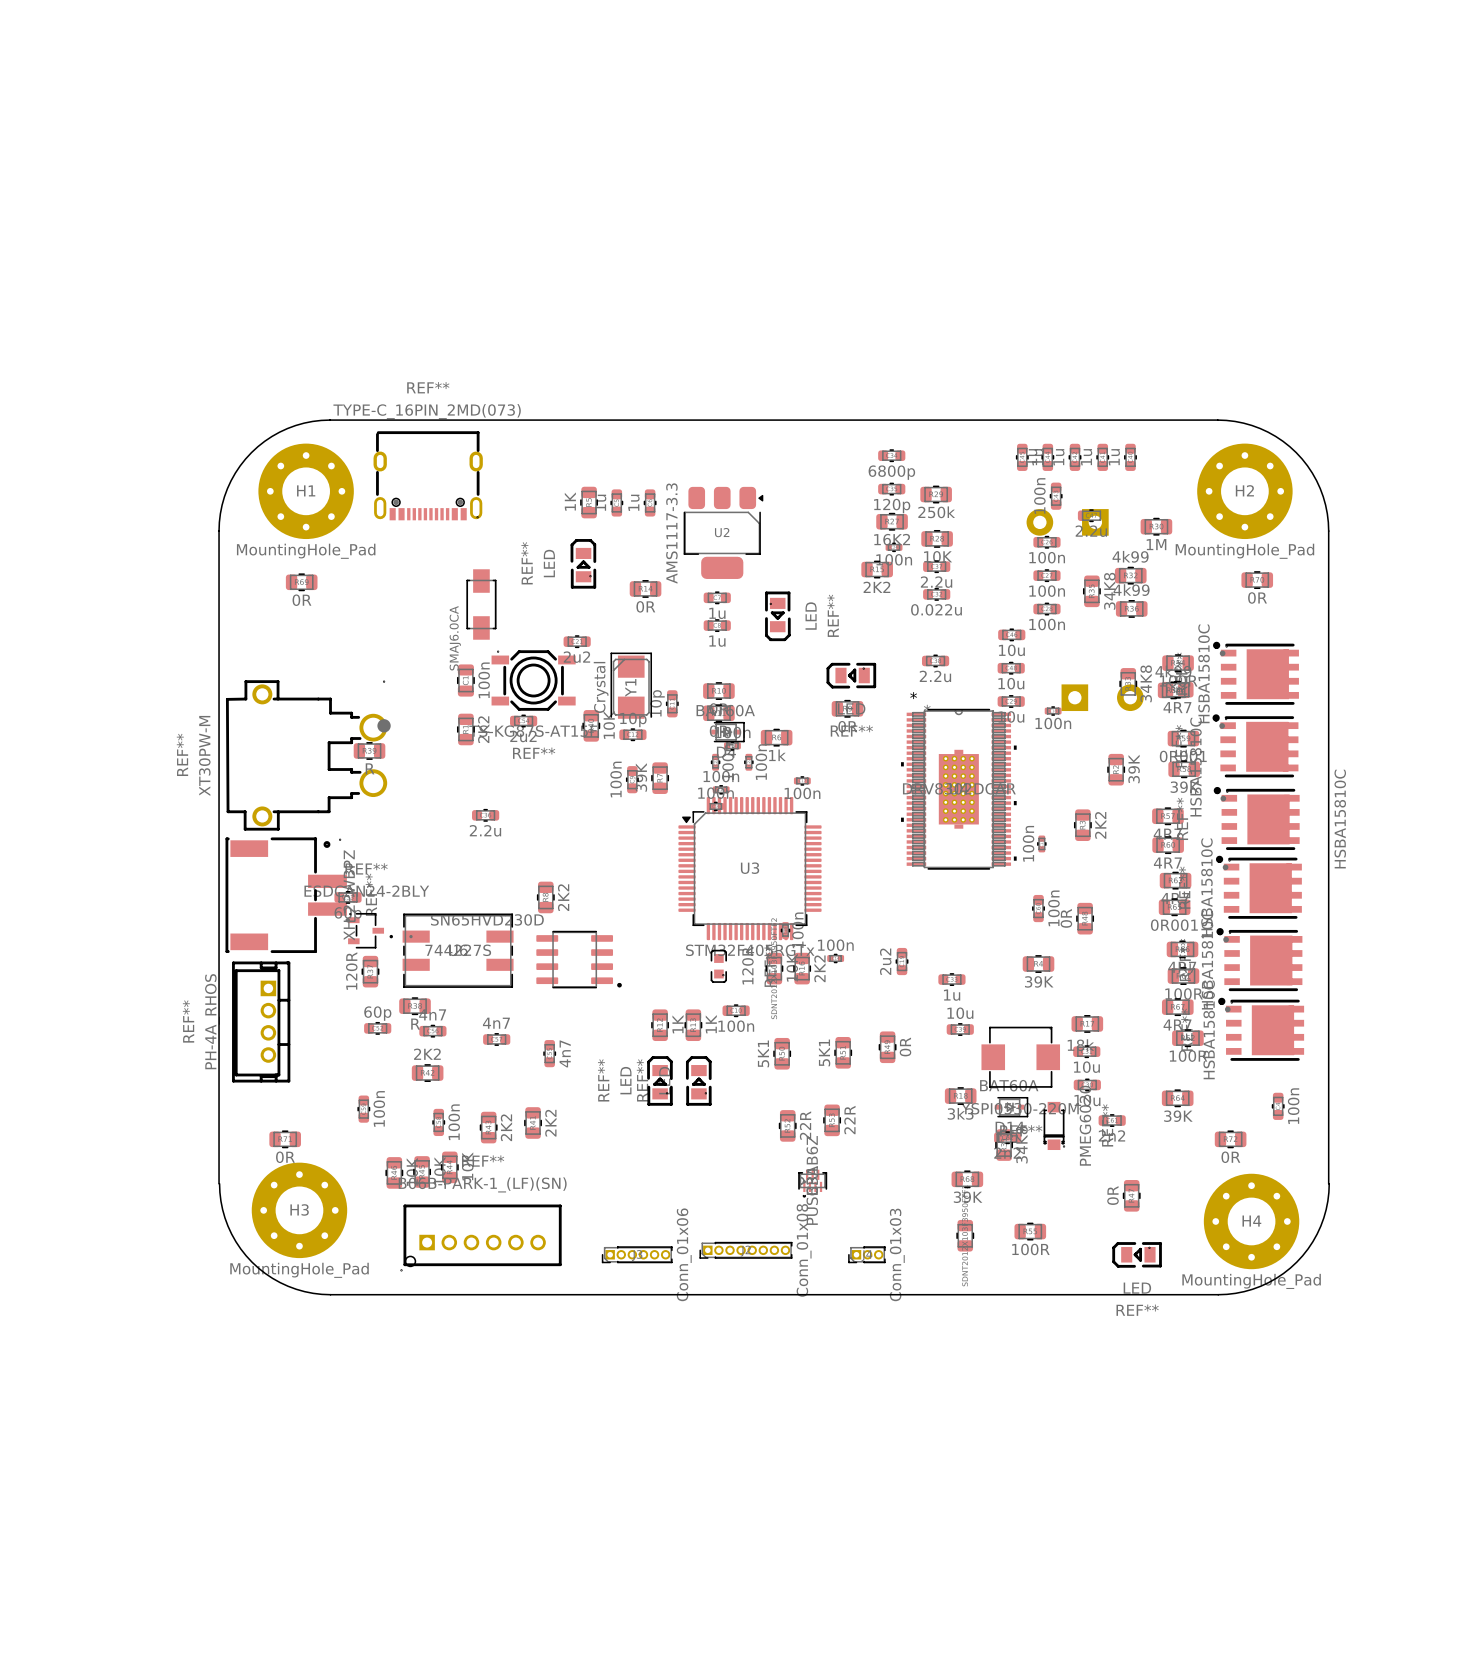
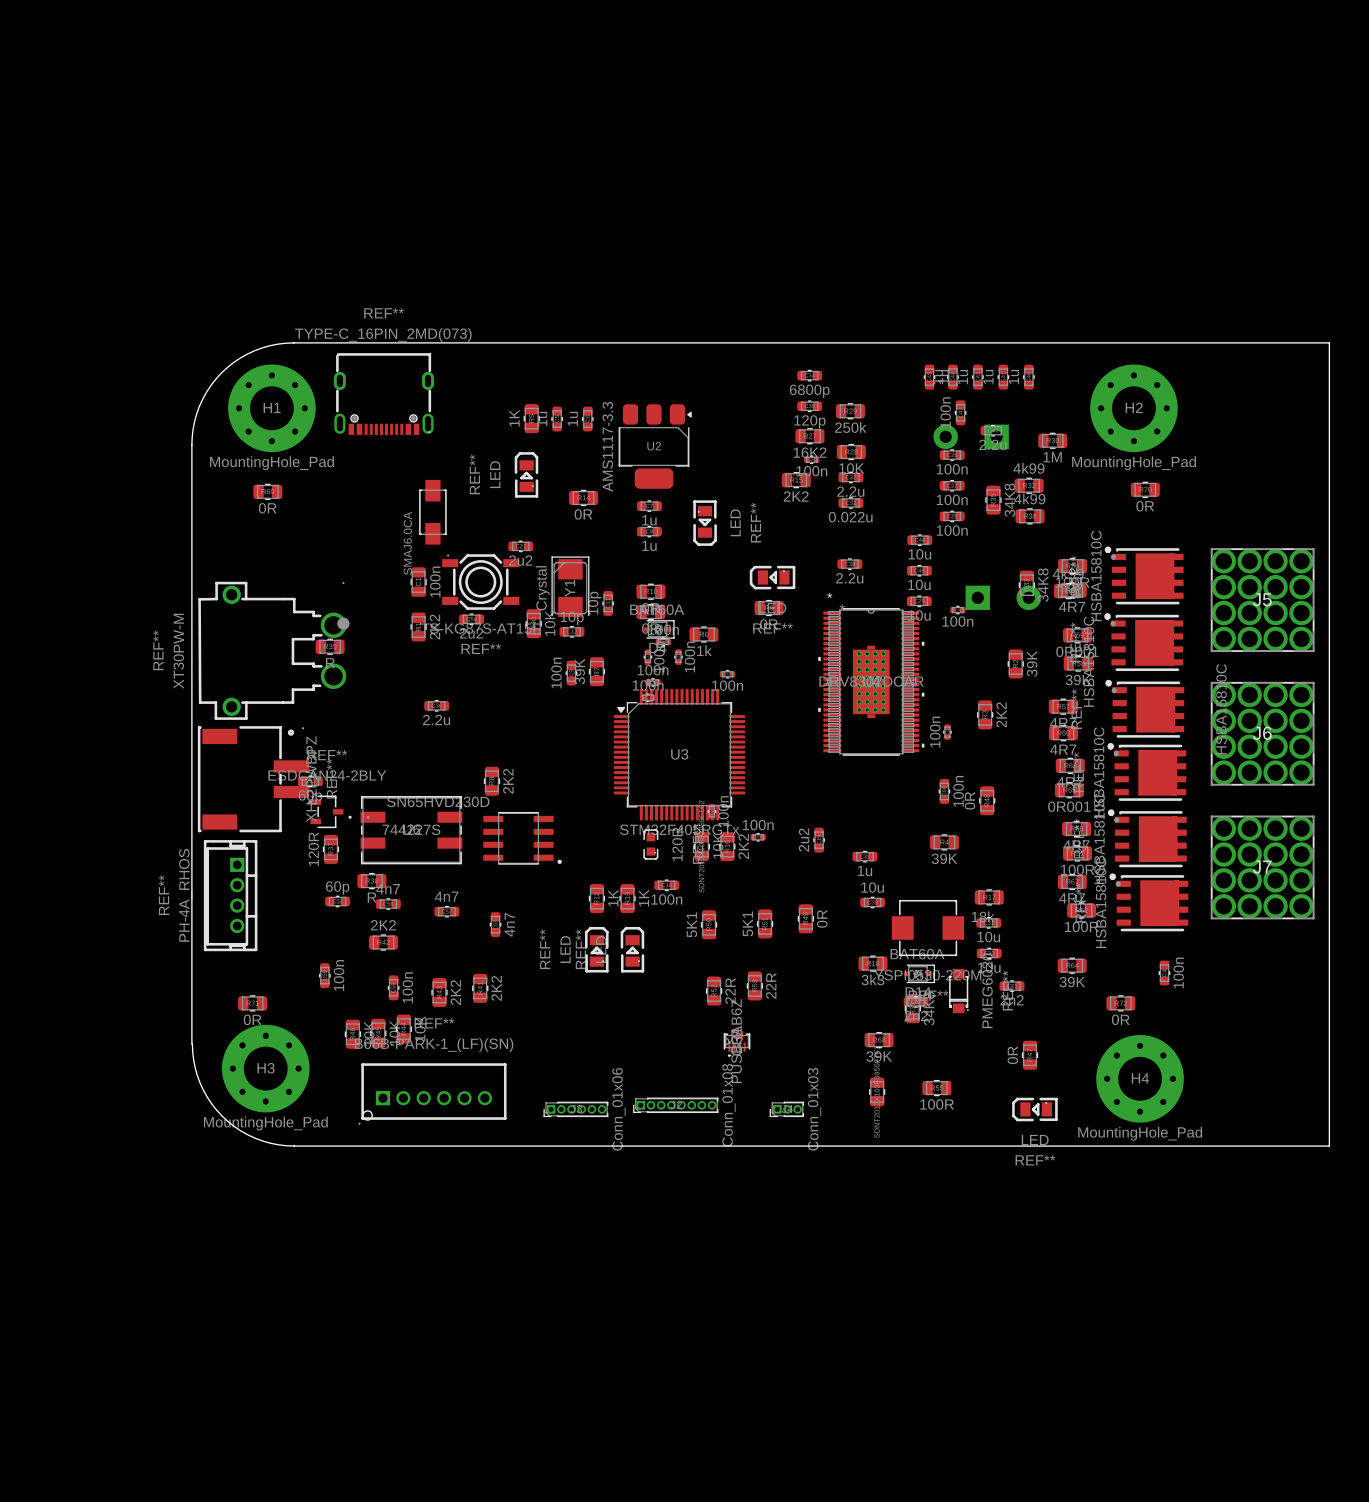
board edge: (1217, 420) (1252, 425) (1275, 436) (1289, 446) (1312, 473) (1323, 496) (1327, 513) (1328, 1183) -> (1108, 342) (1329, 342) (1329, 1145)
J5: none -> (1262, 600)
J6: none -> (1262, 733)
J7: none -> (1262, 867)
board edge: (1329, 1183) (1326, 1209) (1320, 1226) (1312, 1241) (1296, 1262) (1283, 1273) (1260, 1286) (1235, 1293) (1218, 1294) -> (1329, 1146) (1109, 1146)

